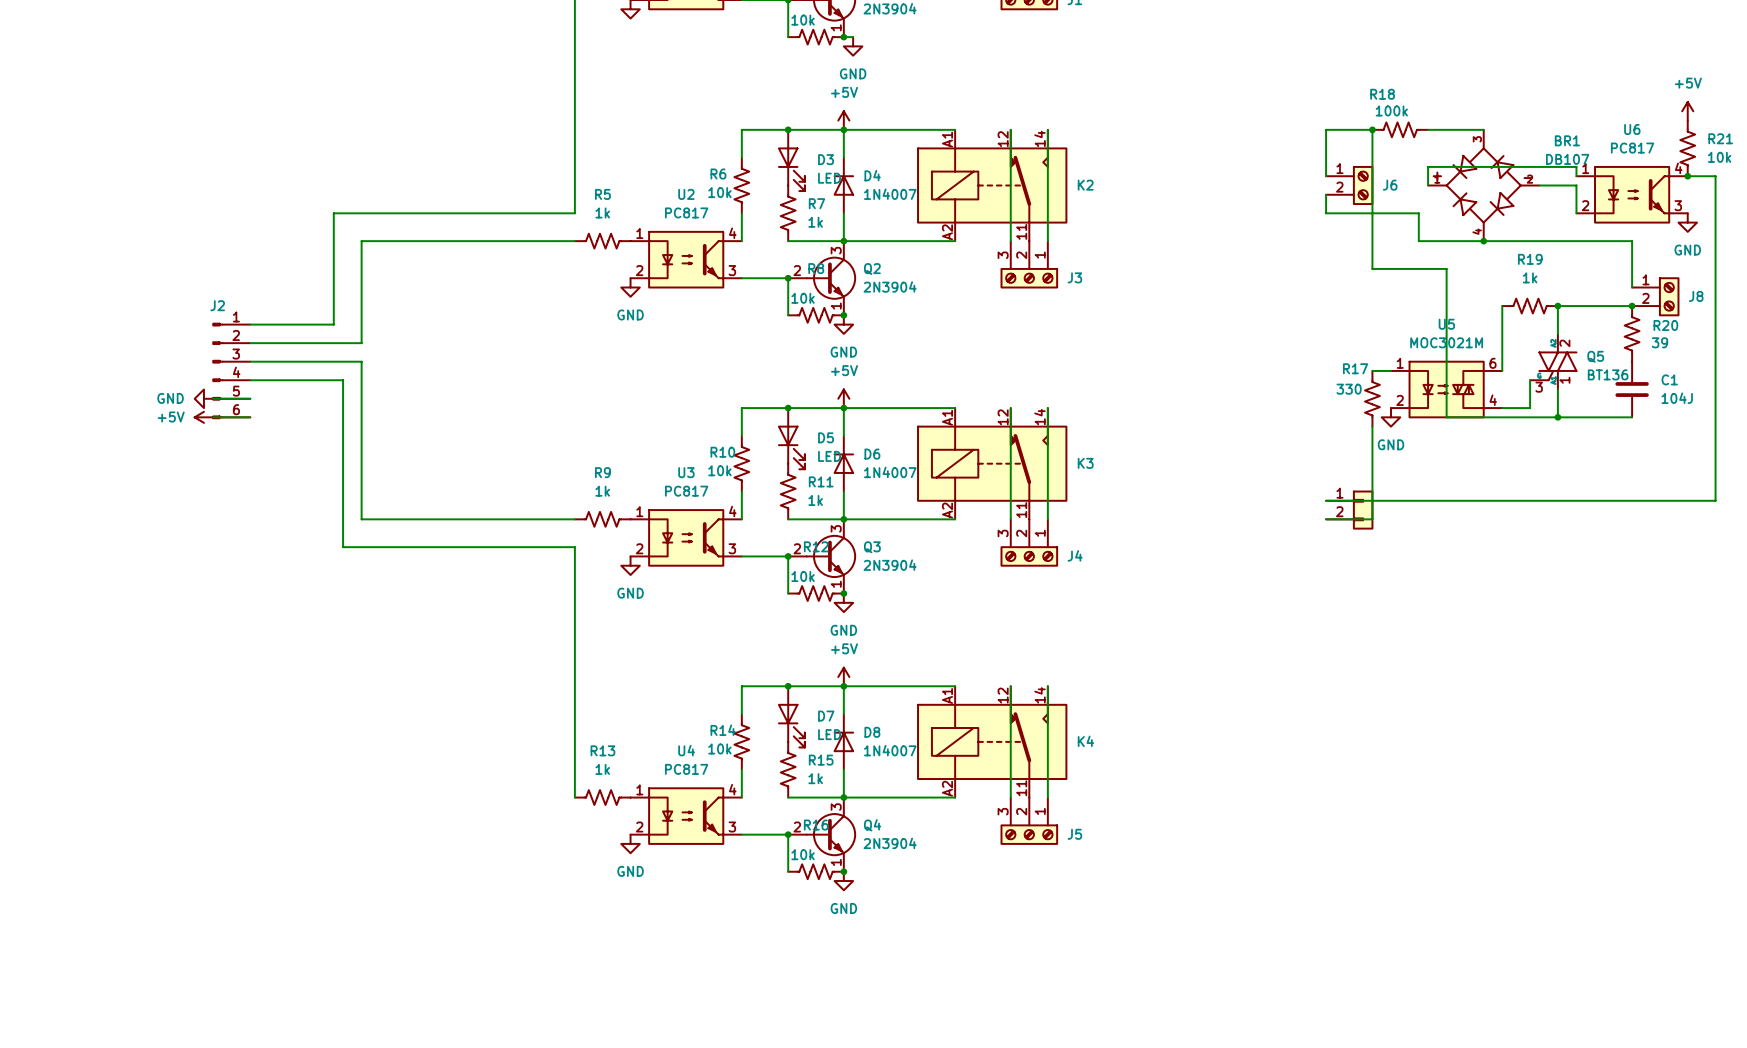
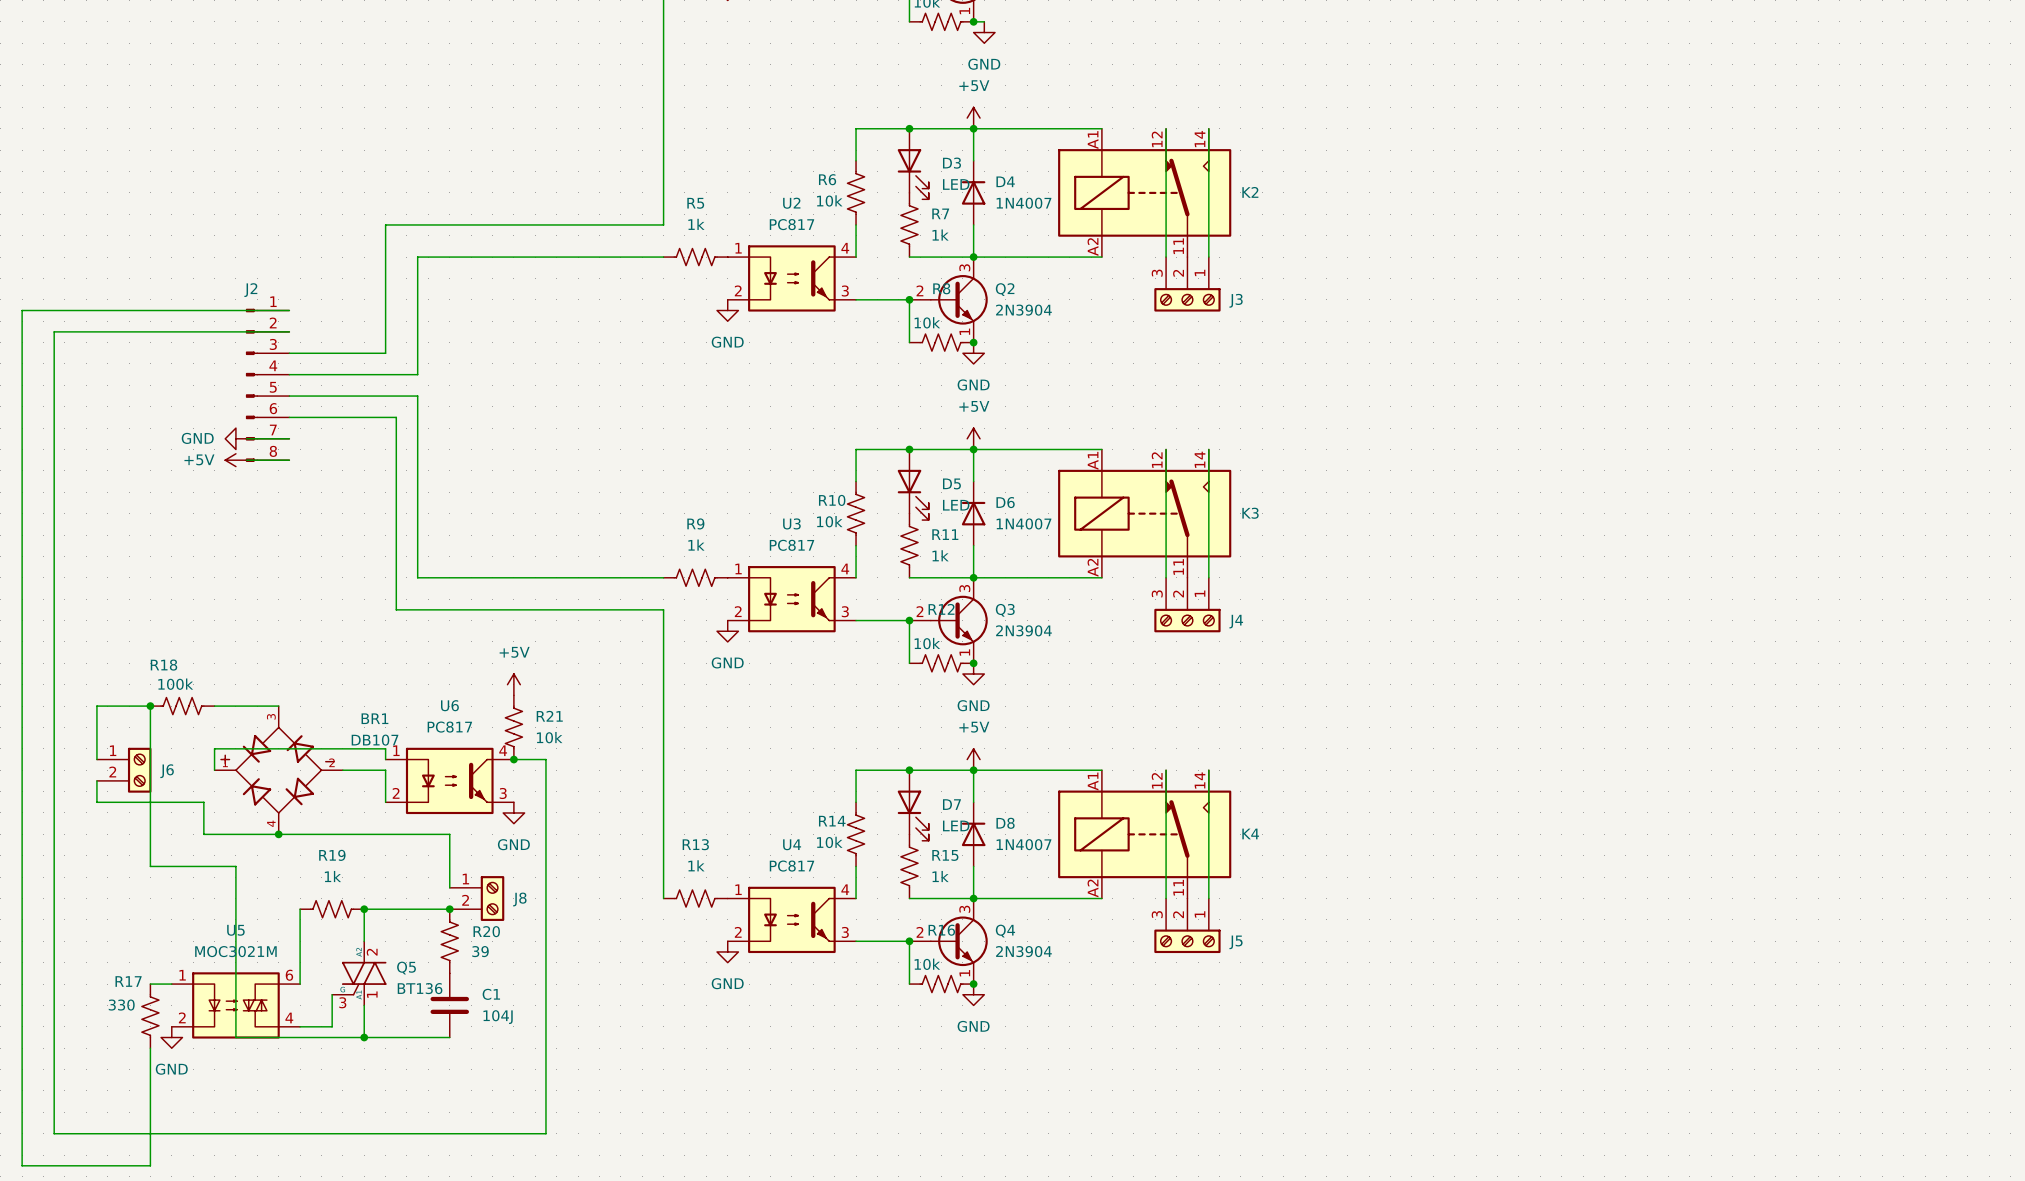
power symbol: +5V (1687, 111) -> none
junction: (1372, 129) -> none
R18 position: (1400, 129) -> (182, 706)
wire: (1428, 129) (1483, 129) -> none
R21 position: (1687, 148) -> (513, 727)
wire: (1326, 176) (1326, 129) (1372, 129) (1372, 268) (1446, 268) (1446, 417) (1632, 417) -> none
wire: (1576, 176) (1576, 166) (1428, 166) (1428, 185) -> none
wire: (1687, 176) (1715, 176) (1715, 500) (1326, 500) -> none
junction: (1687, 176) -> none
J6 position: (1349, 185) -> (124, 770)
BR1 position: (1483, 185) -> (278, 770)
wire: (1539, 185) (1576, 185) (1576, 213) -> none
wire: (1326, 194) (1326, 213) (1418, 213) (1418, 241) (1632, 241) (1632, 287) -> none
U6 position: (1632, 194) -> (449, 780)
power symbol: GND (1687, 222) -> none
junction: (1483, 241) -> none
wire: none -> (289, 310) (22, 310) (22, 1165) (150, 1165) (150, 1048)
J8 position: (1655, 296) -> (477, 898)
J2 name position: J2 (217, 305) -> J2 (250, 290)
wire: none -> (289, 331) (54, 331) (54, 1133) (545, 1133) (545, 759) (513, 759)
wire: (1502, 306) (1502, 370) -> none
R19 position: (1530, 306) -> (332, 909)
junction: (1557, 306) -> none
wire: (1632, 306) (1557, 306) (1557, 333) -> none
junction: (1632, 306) -> none
J2 symbol: [212, 323, 251, 419] -> [245, 308, 290, 462]
R20 position: (1632, 333) -> (449, 941)
Q5 position: (1553, 361) -> (359, 973)
wire: (1372, 370) (1390, 370) -> none
wire: (1530, 380) (1530, 408) (1502, 408) -> none
U5 position: (1446, 389) -> (235, 1005)
wire: (1557, 389) (1557, 417) -> none
C1 position: (1632, 389) -> (449, 1005)
R17 position: (1372, 398) -> (150, 1016)
power symbol: GND (1390, 417) -> none
junction: (1557, 417) -> none
wire: (1372, 426) (1372, 519) (1326, 519) -> none
part: (1349, 510) -> none
power symbol: none -> +5V (513, 684)
junction: none -> (150, 706)
wire: none -> (214, 706) (278, 706)
wire: none -> (96, 759) (96, 706) (150, 706) (150, 866) (235, 866) (235, 1037) (449, 1037)
wire: none -> (385, 759) (385, 748) (214, 748) (214, 770)
junction: none -> (513, 759)
wire: none -> (342, 770) (385, 770) (385, 802)
wire: none -> (96, 780) (96, 802) (203, 802) (203, 834) (449, 834) (449, 887)
power symbol: none -> GND (513, 812)
junction: none -> (278, 834)
wire: none -> (300, 909) (300, 984)
junction: none -> (364, 909)
wire: none -> (449, 909) (364, 909) (364, 941)
junction: none -> (449, 909)
wire: none -> (150, 984) (171, 984)
wire: none -> (332, 994) (332, 1026) (300, 1026)
wire: none -> (364, 1005) (364, 1037)
power symbol: none -> GND (171, 1037)
junction: none -> (364, 1037)

